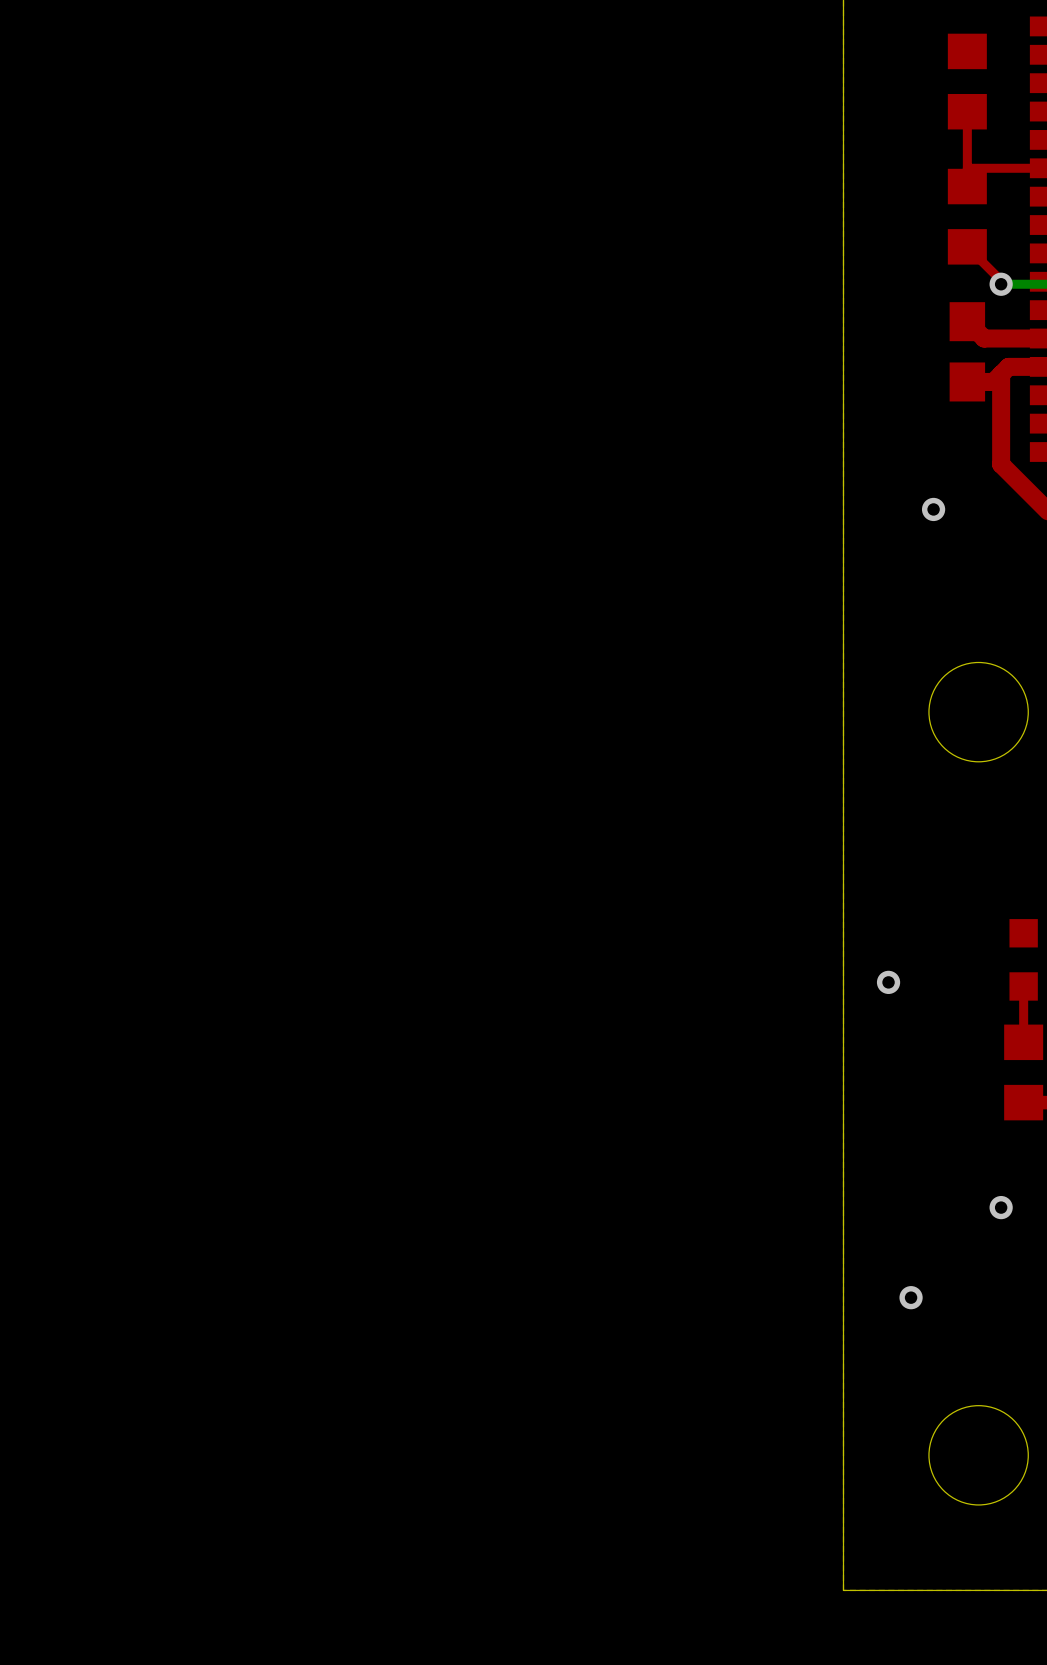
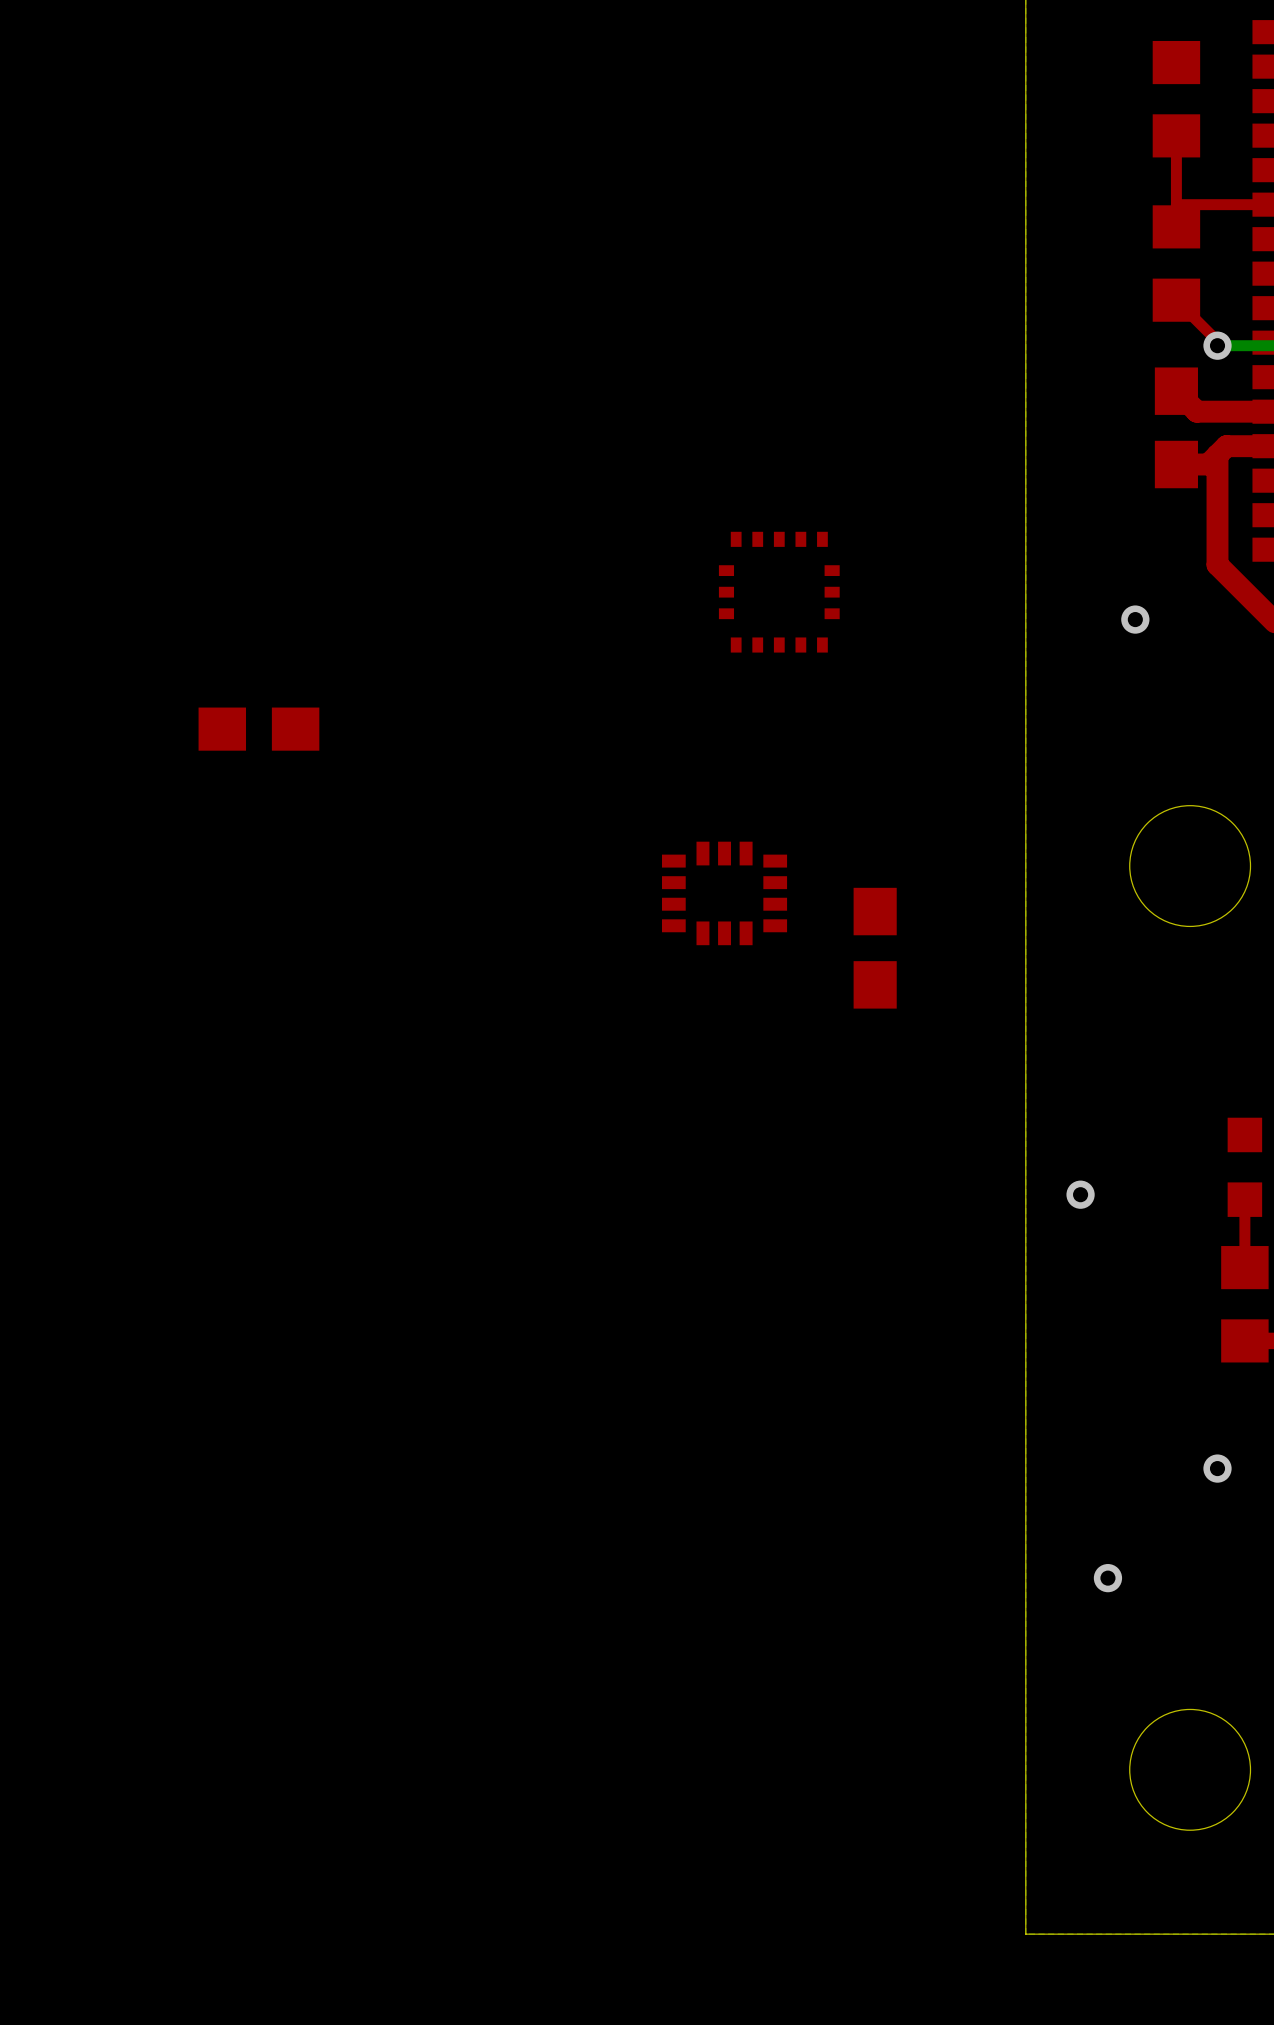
part: none -> (779, 592)
part: none -> (258, 729)
part: none -> (724, 893)
part: none -> (875, 948)

